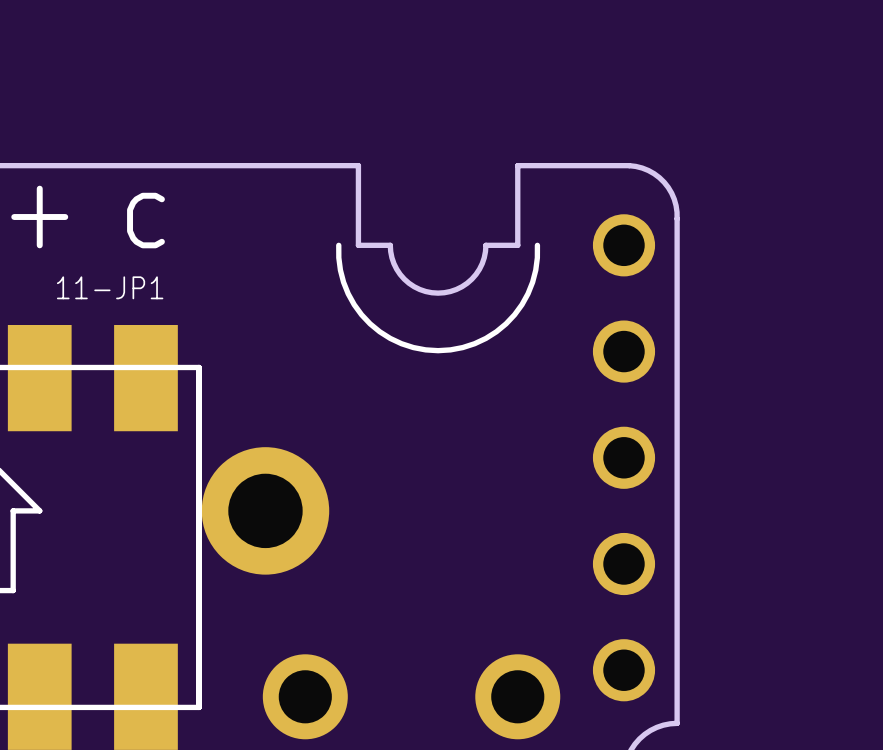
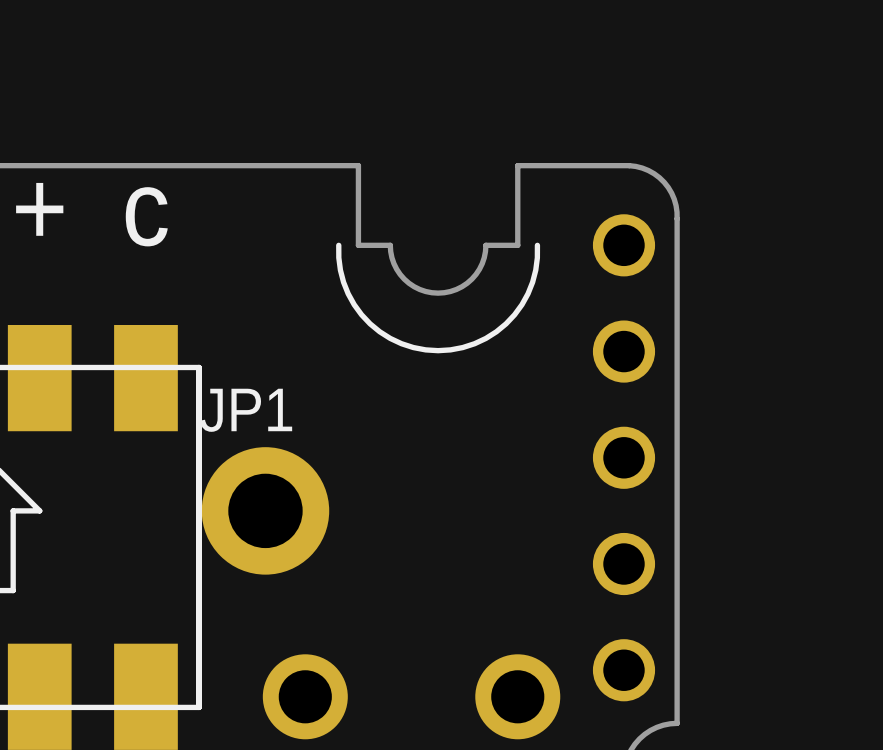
11-JP1 name: 11-JP1 (110, 287) -> JP1 (246, 410)

